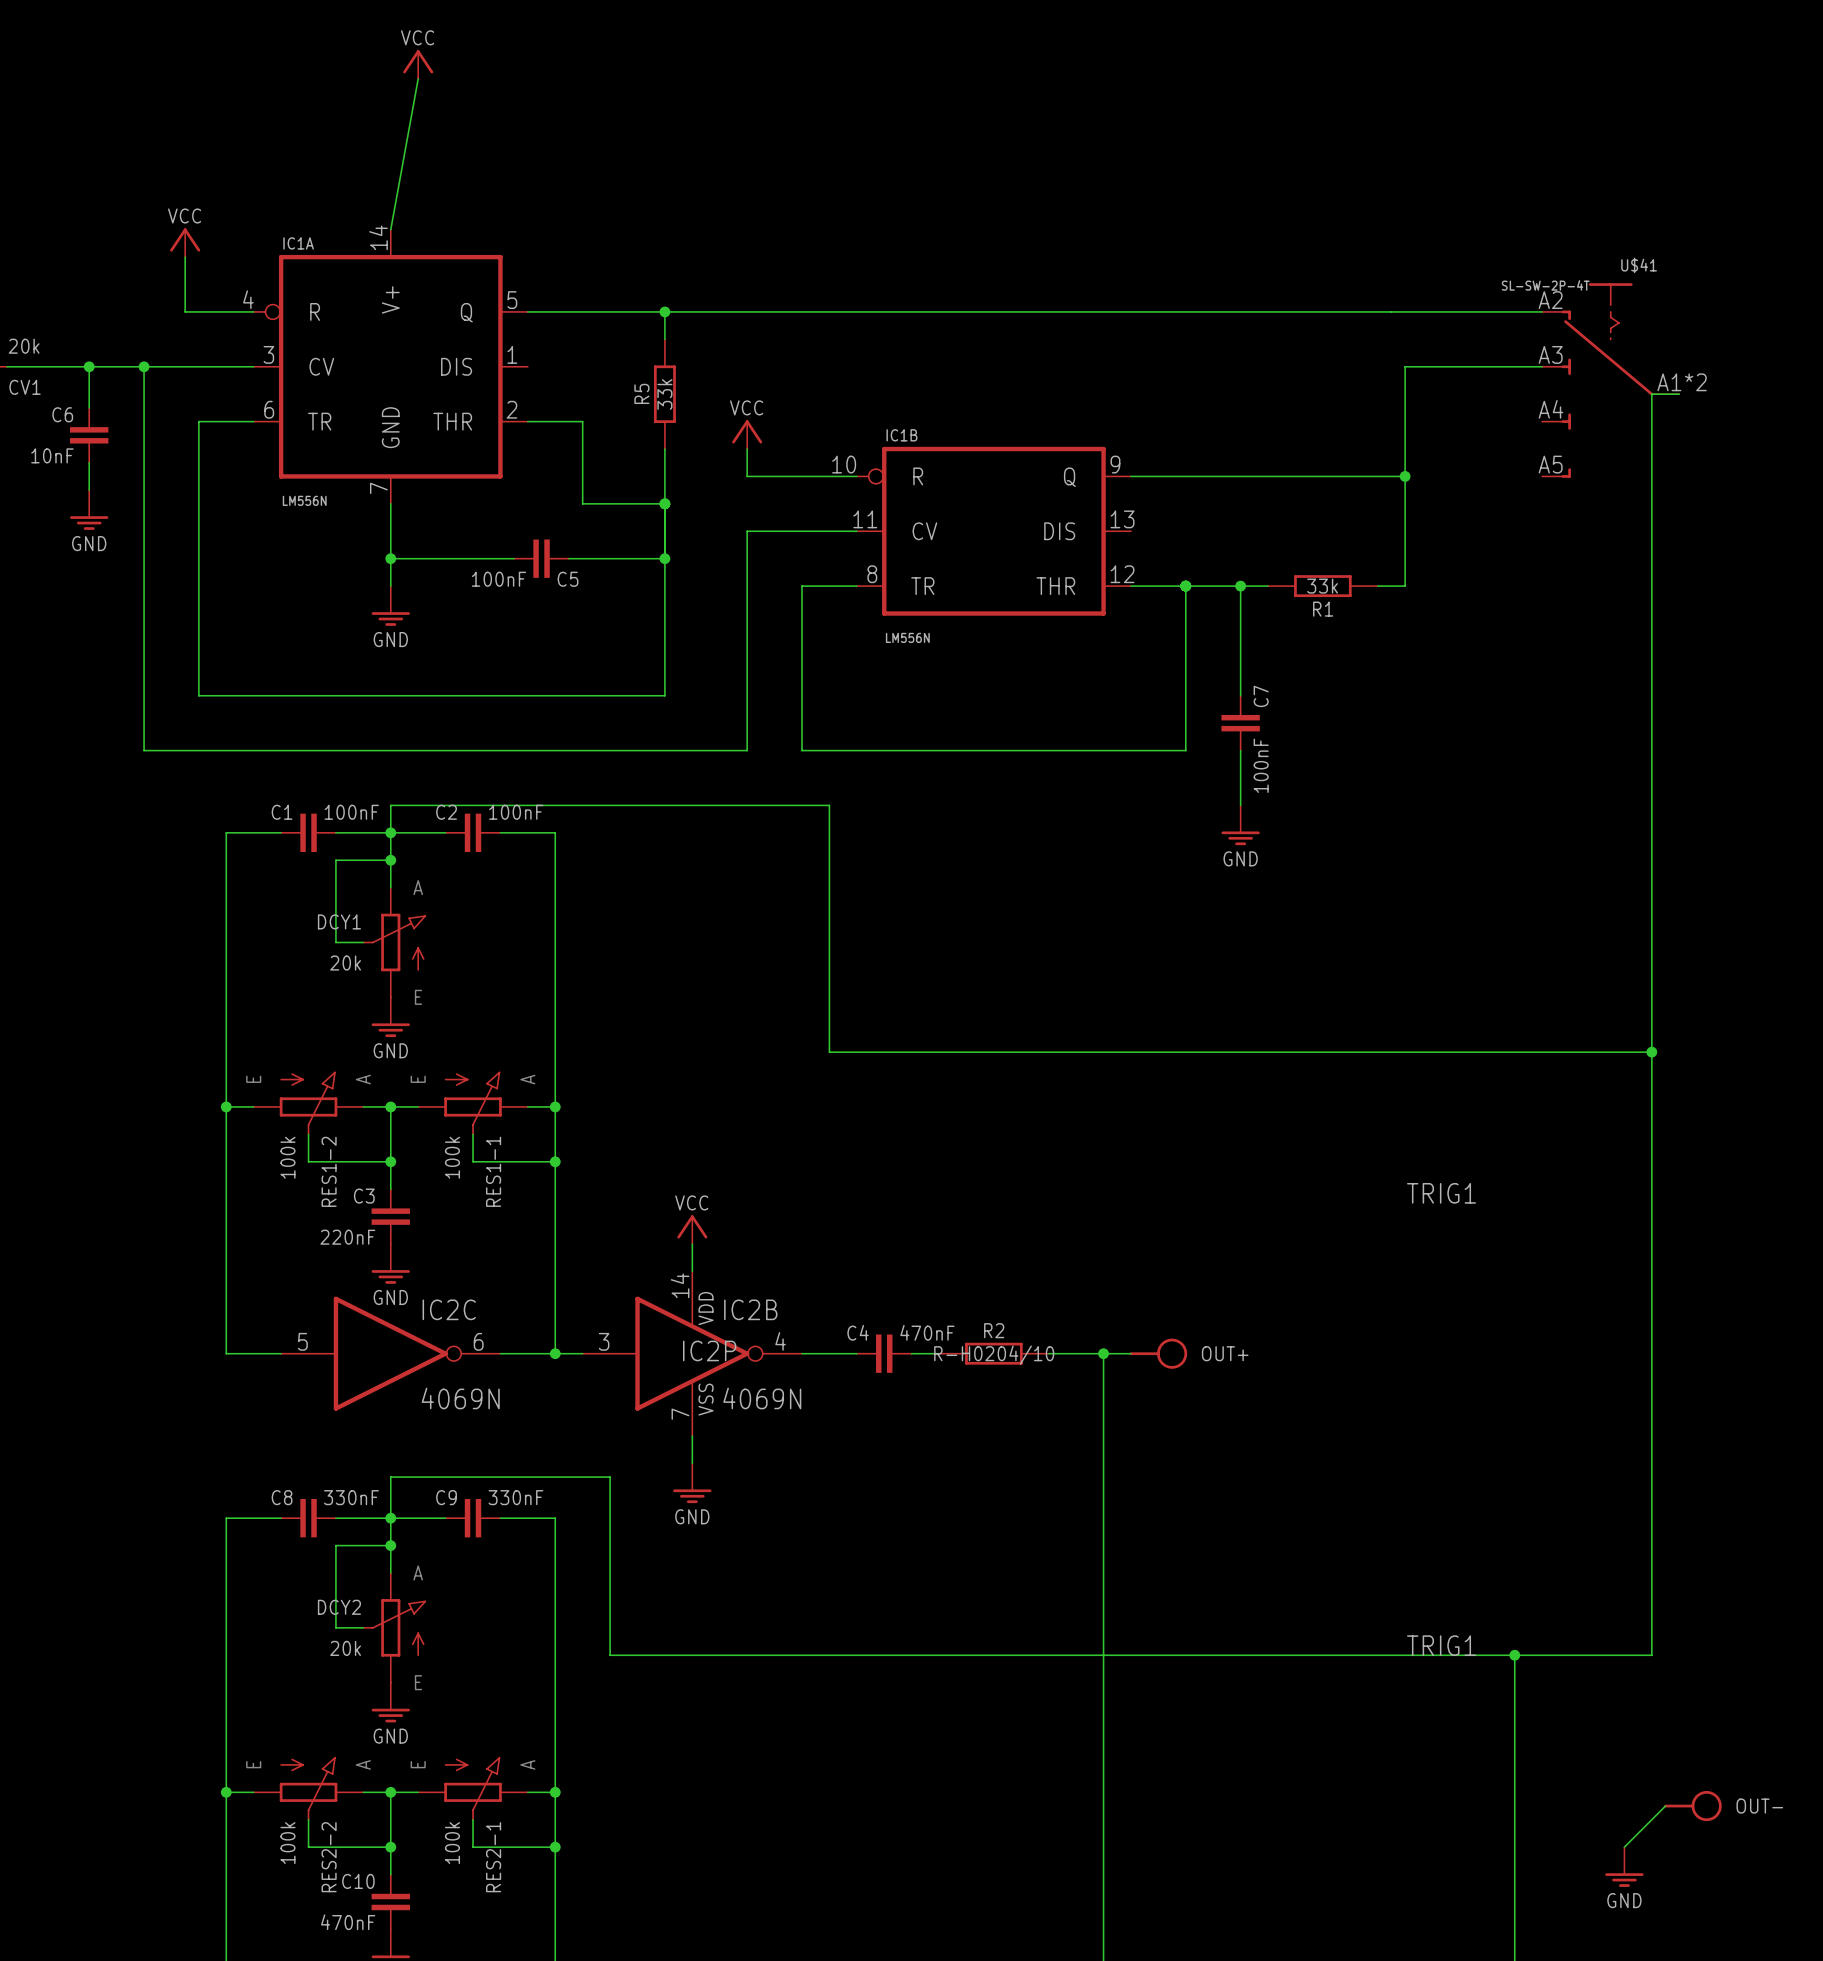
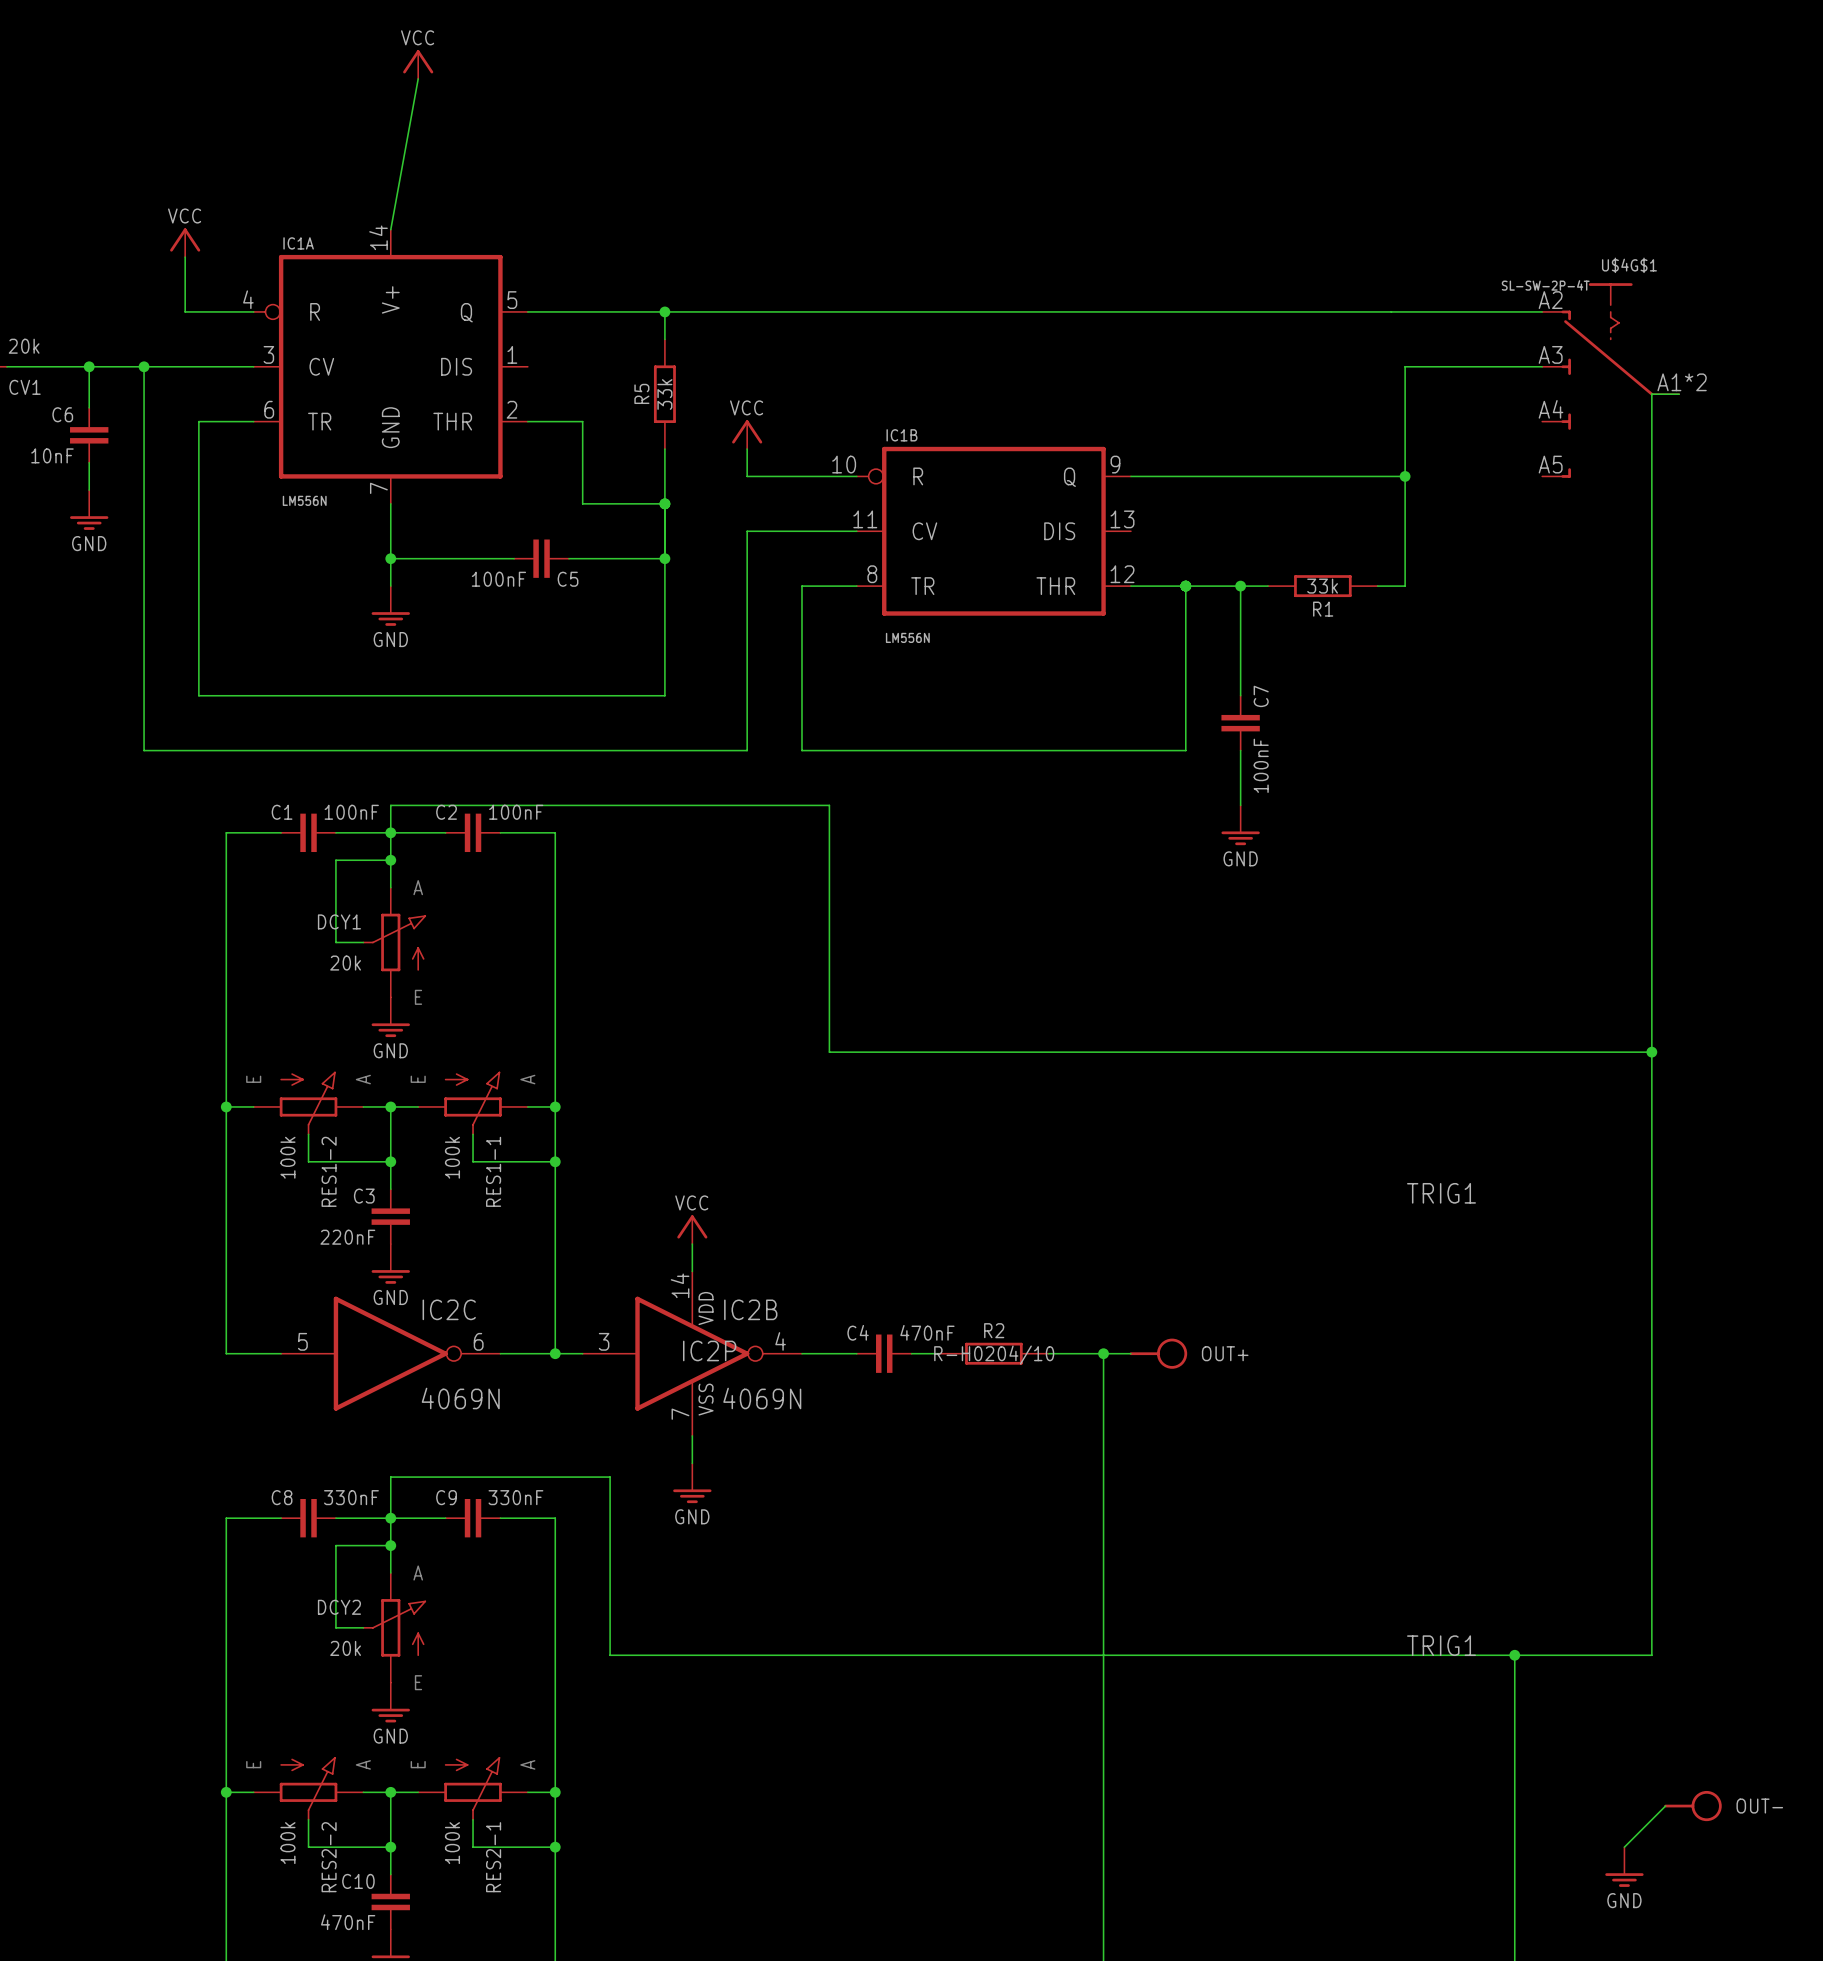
U$41 name: U$41 (1639, 265) -> U$4G$1 (1629, 265)

